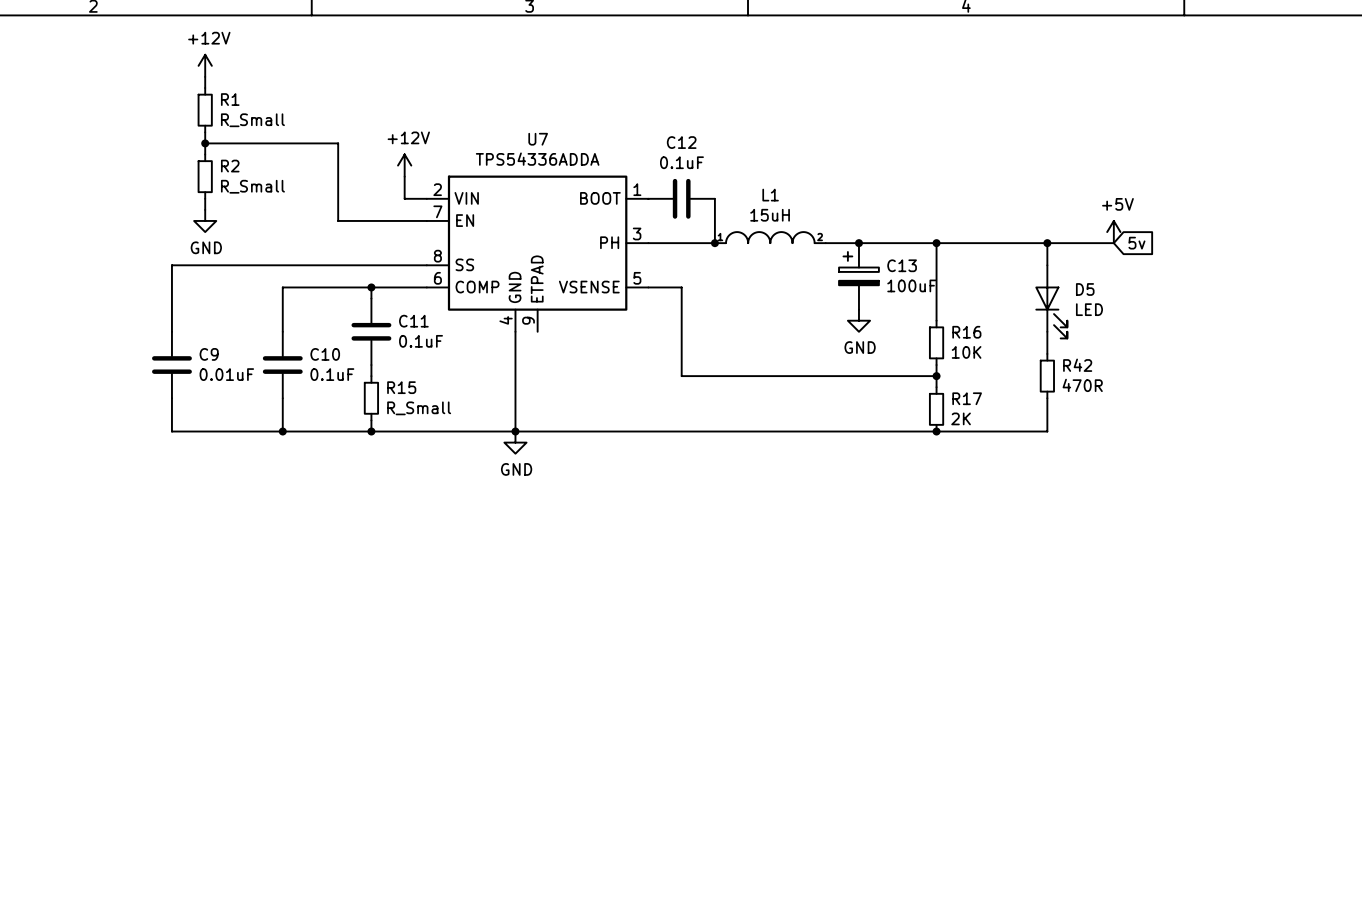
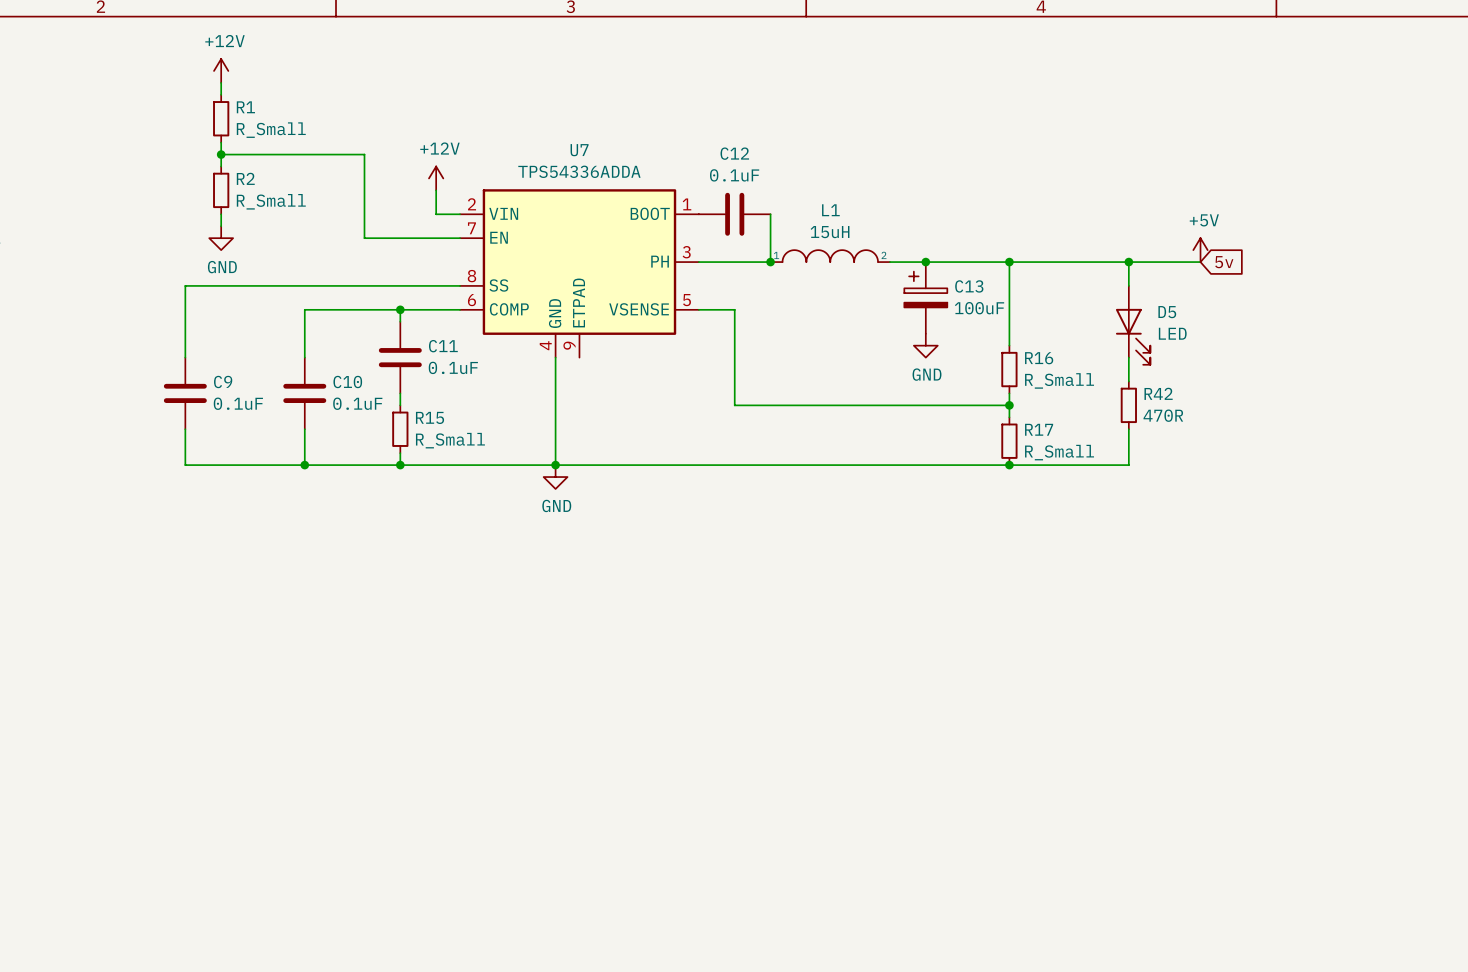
R16 value: 10K (966, 352) -> R_Small (1059, 380)
C9 value: 0.01uF (226, 374) -> 0.1uF (238, 403)
R17 value: 2K (961, 418) -> R_Small (1059, 452)

